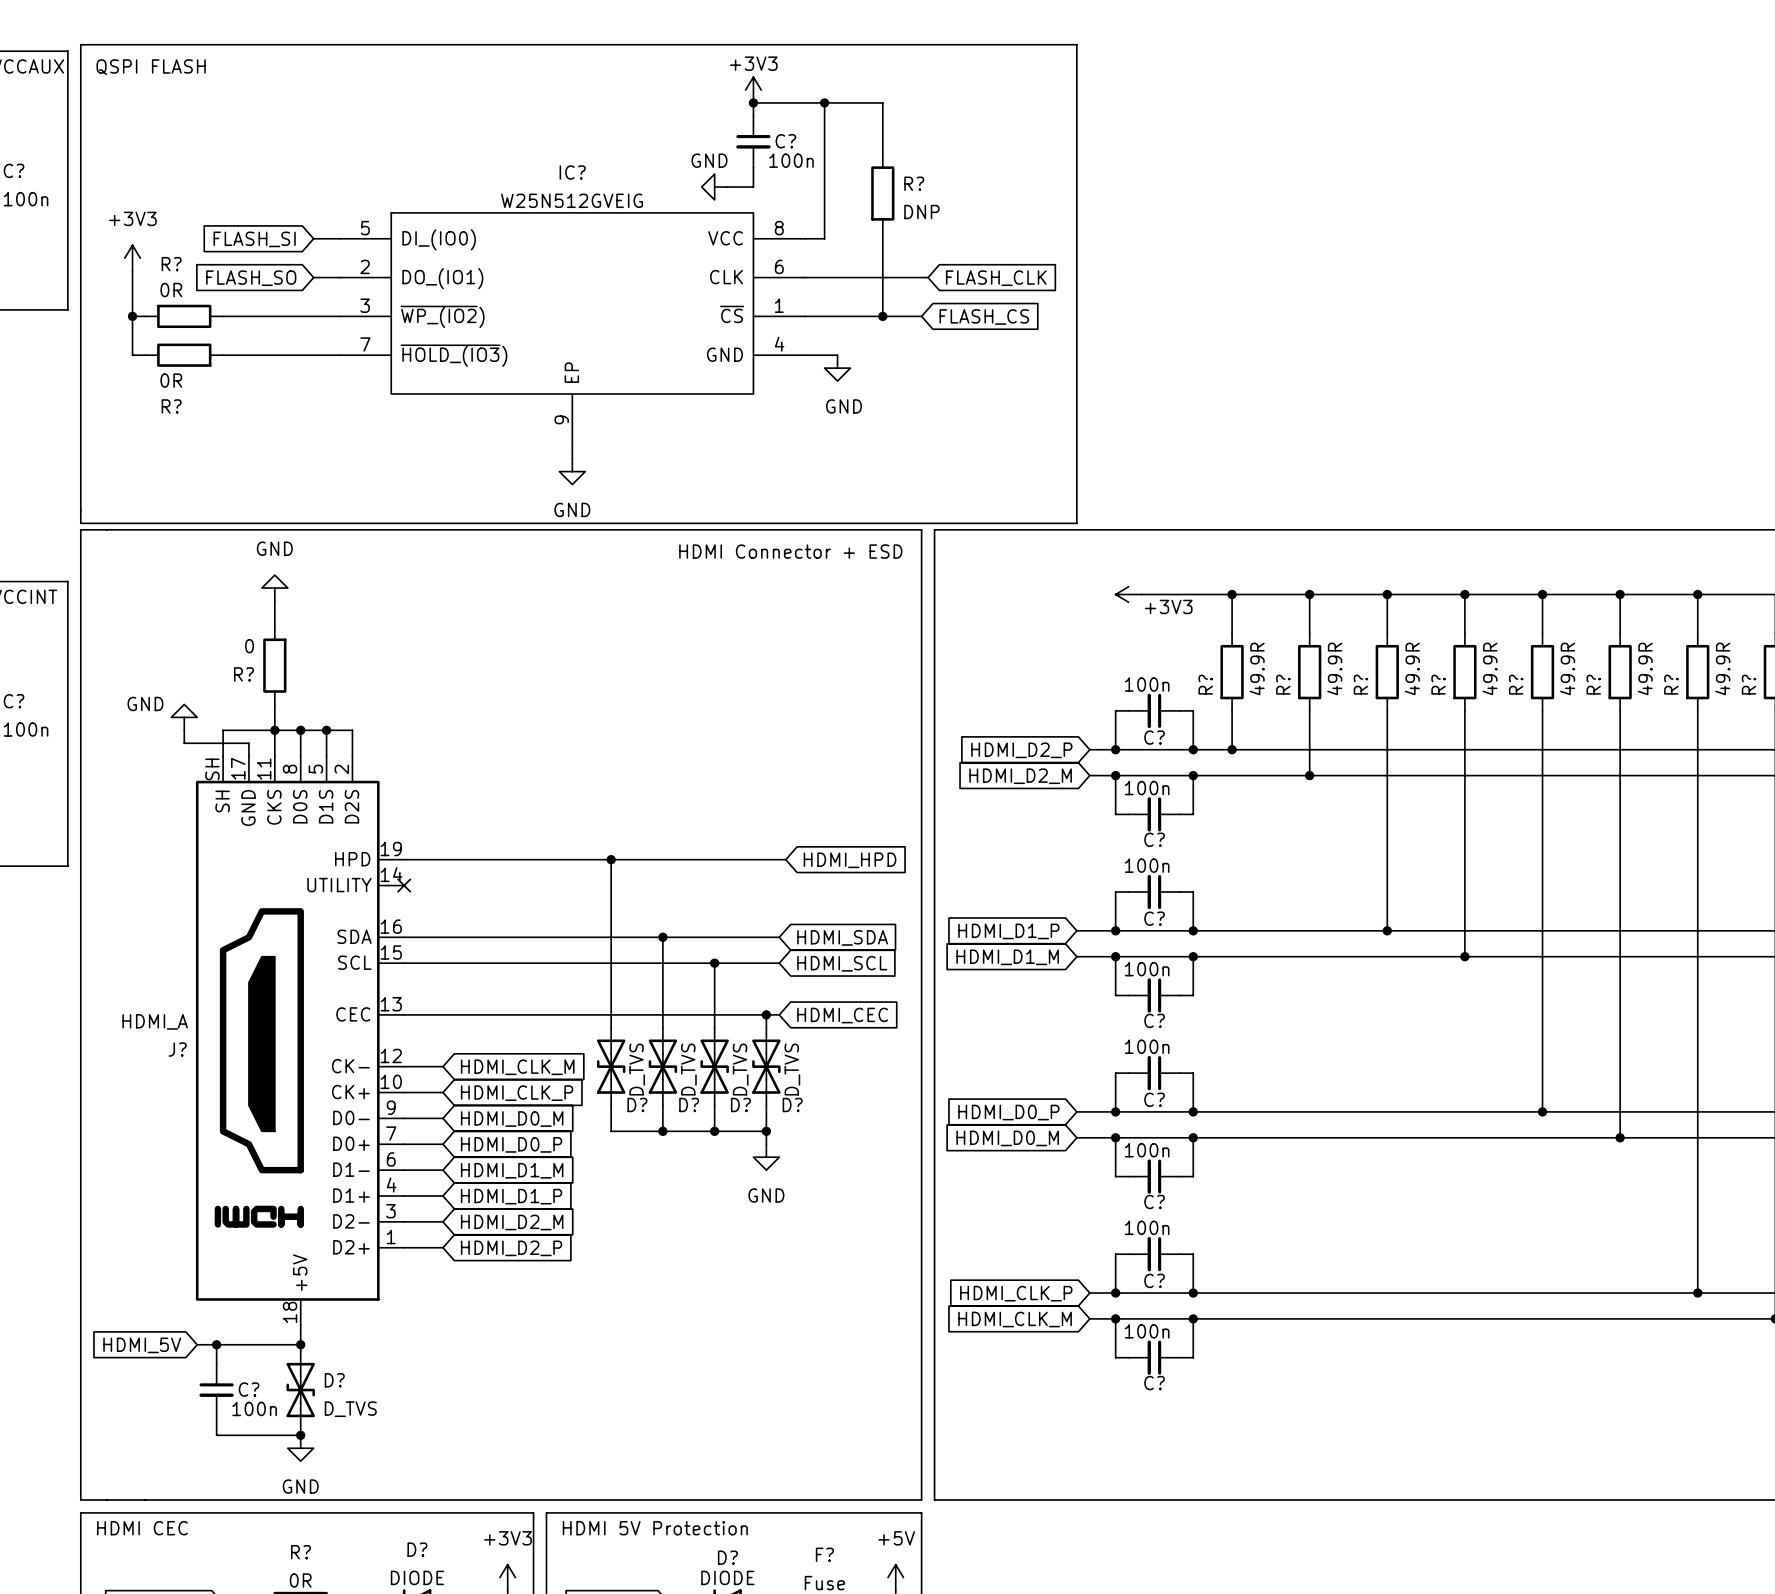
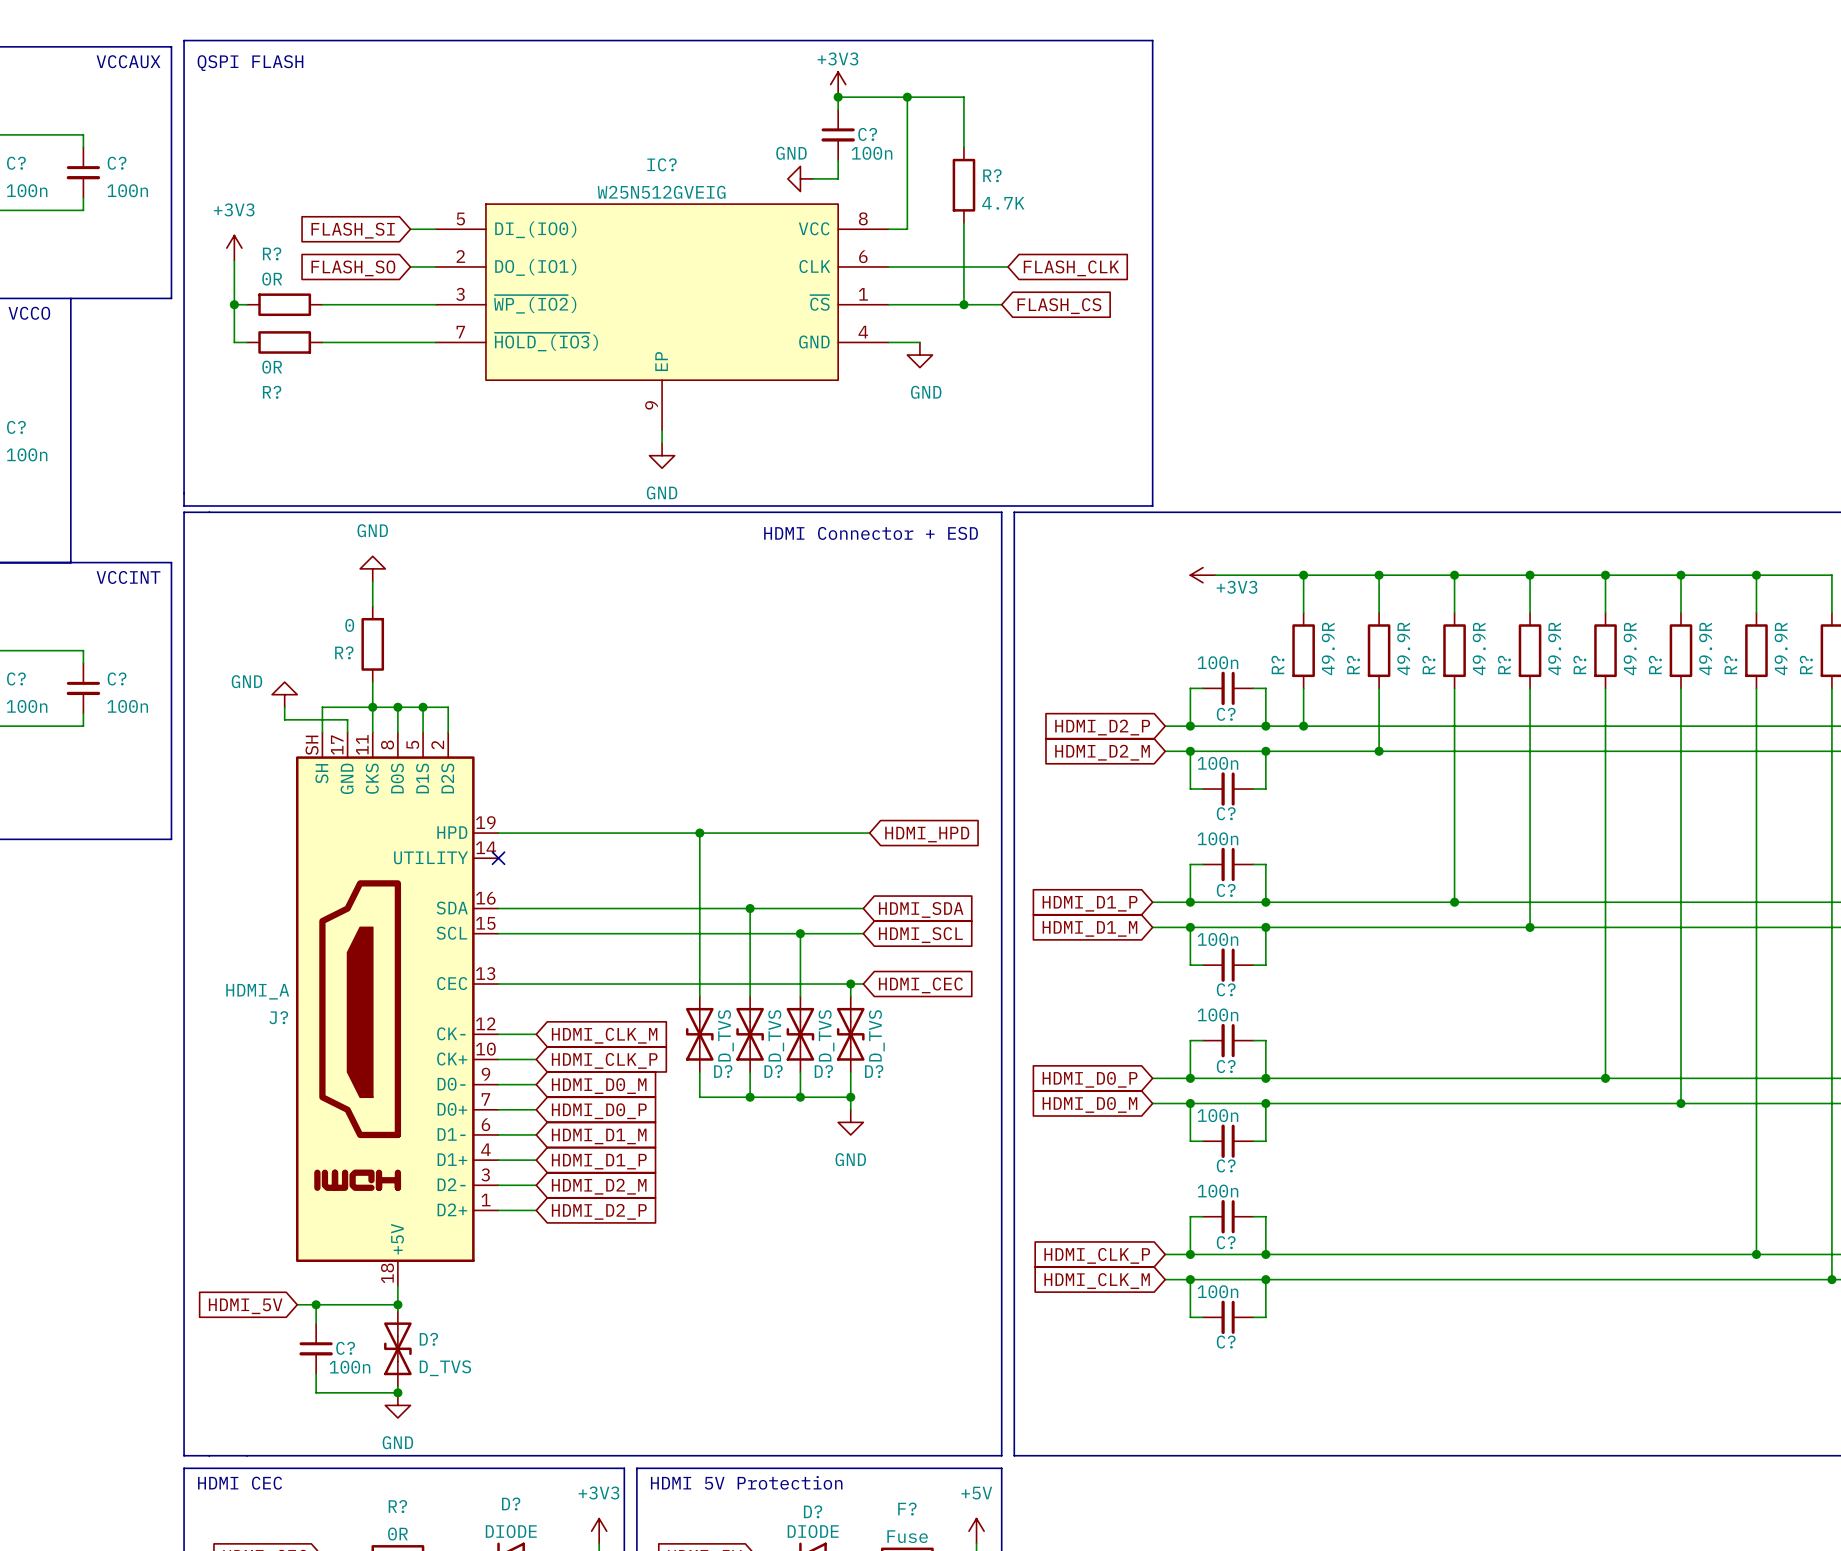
R? value: DNP (921, 212) -> 4.7K (1003, 203)

